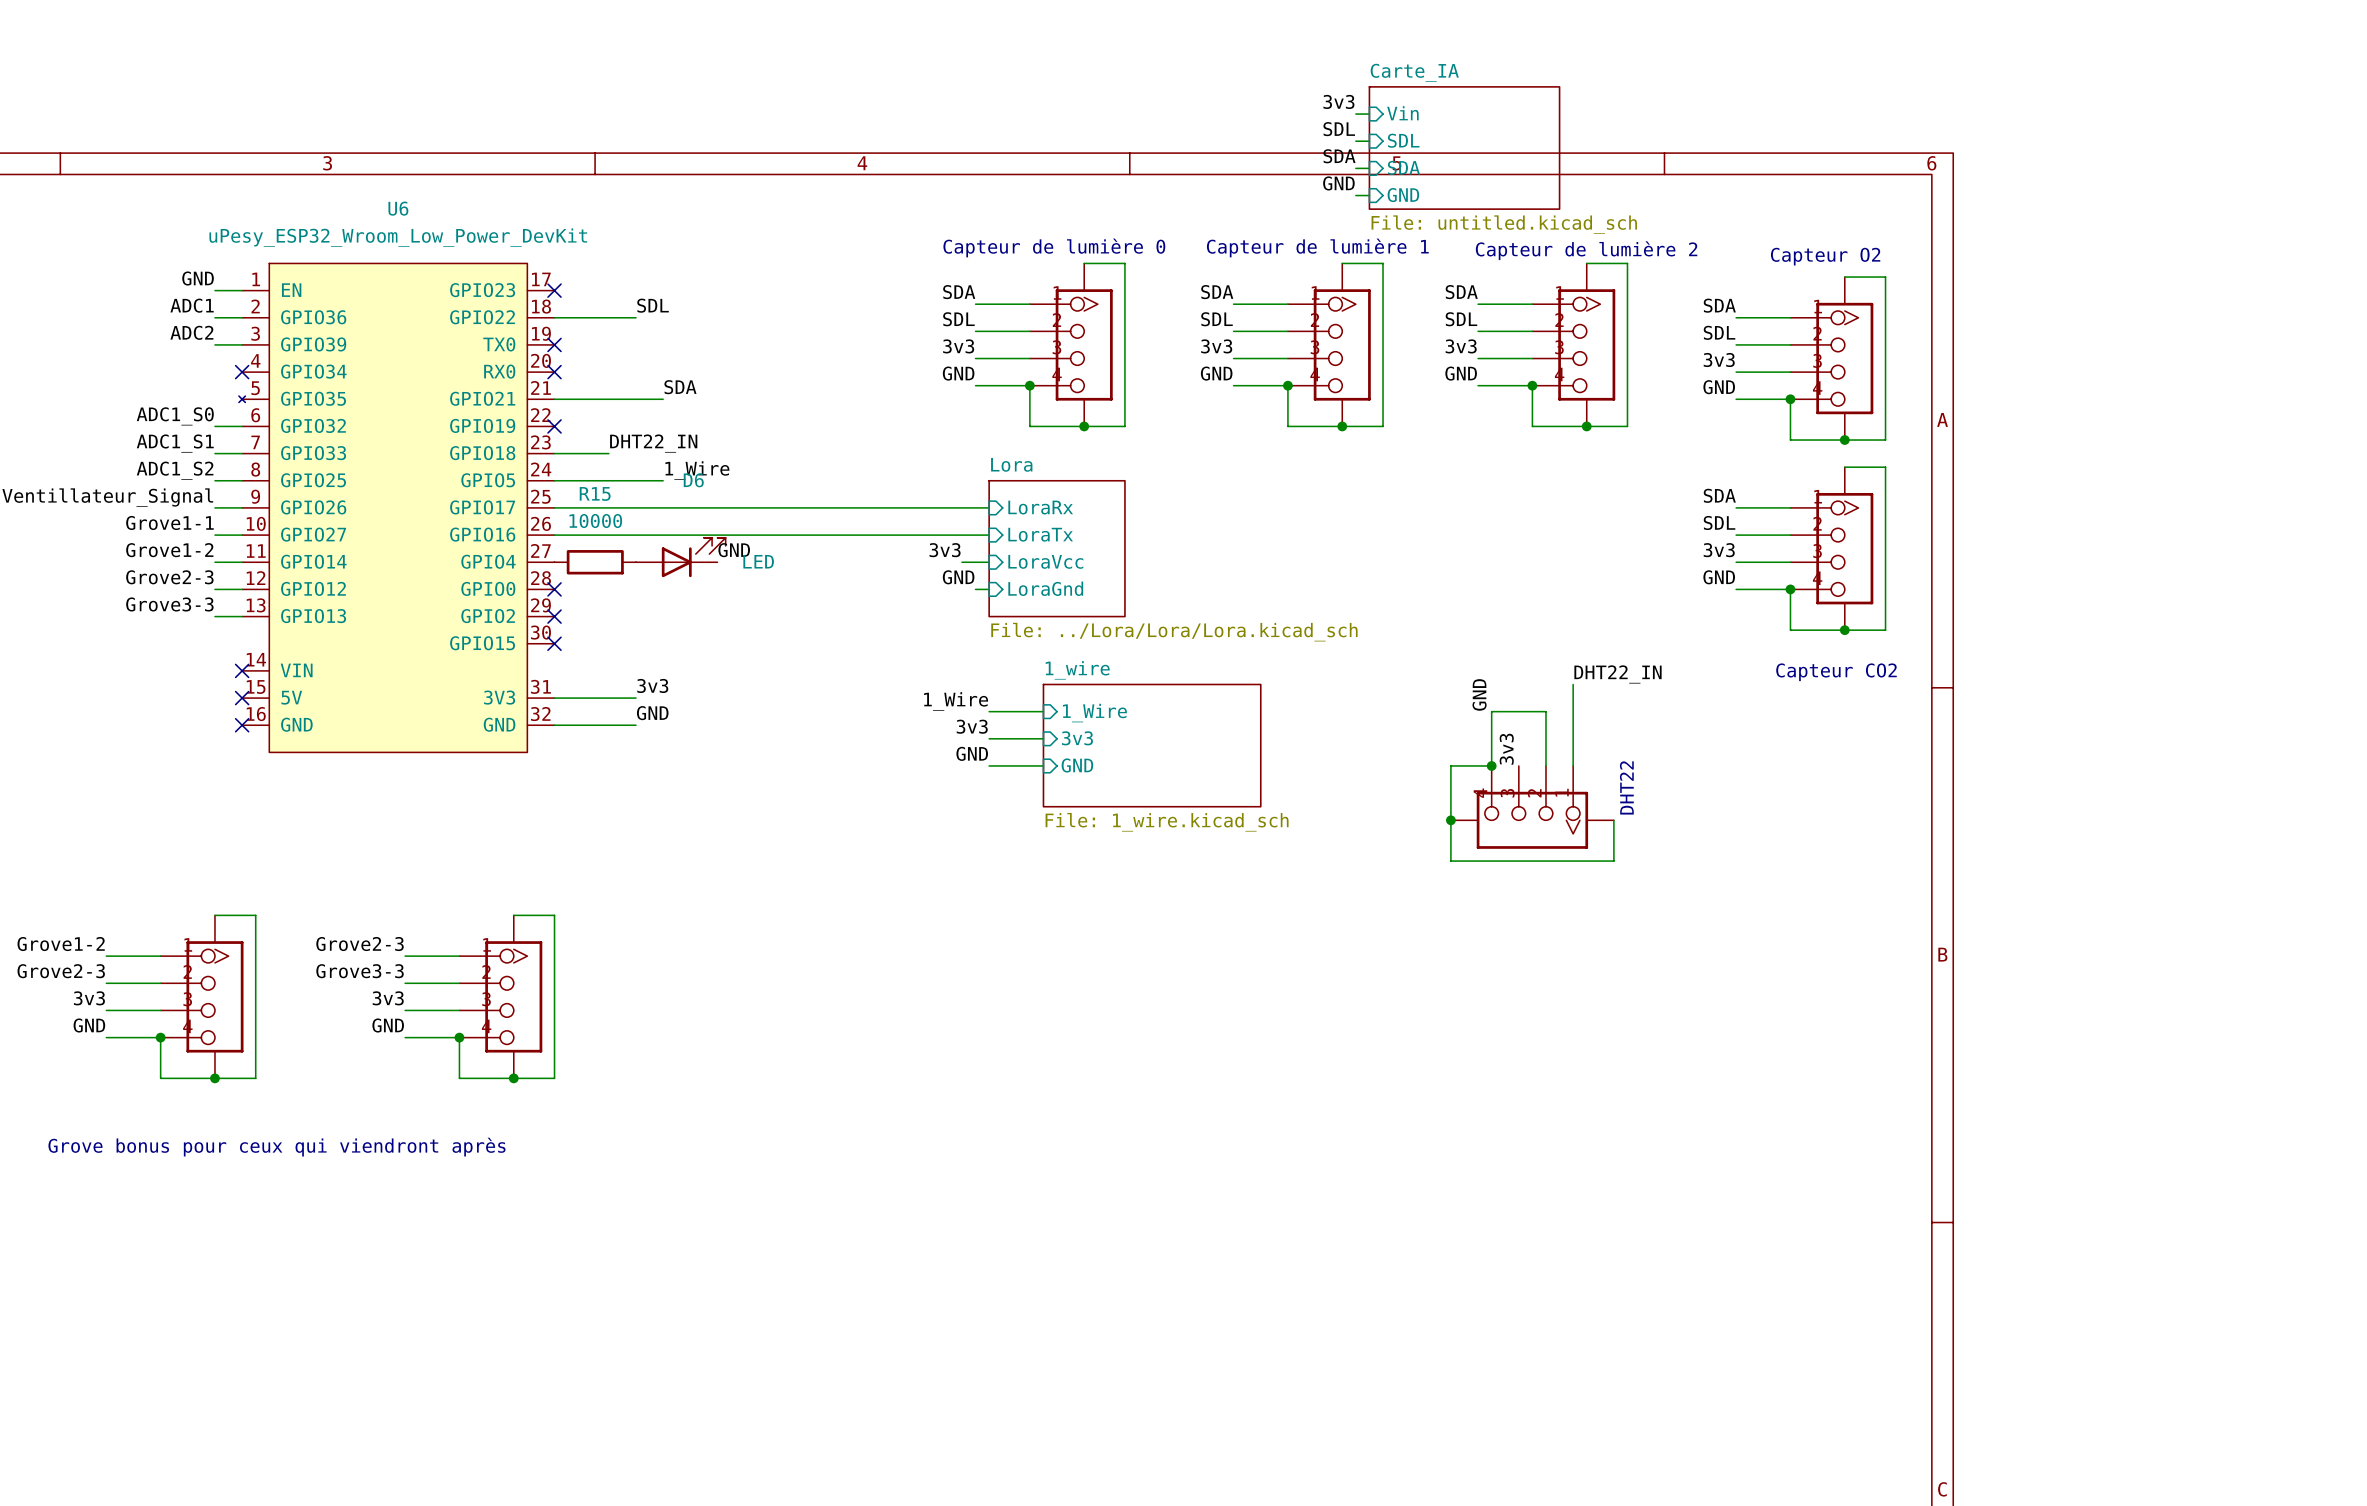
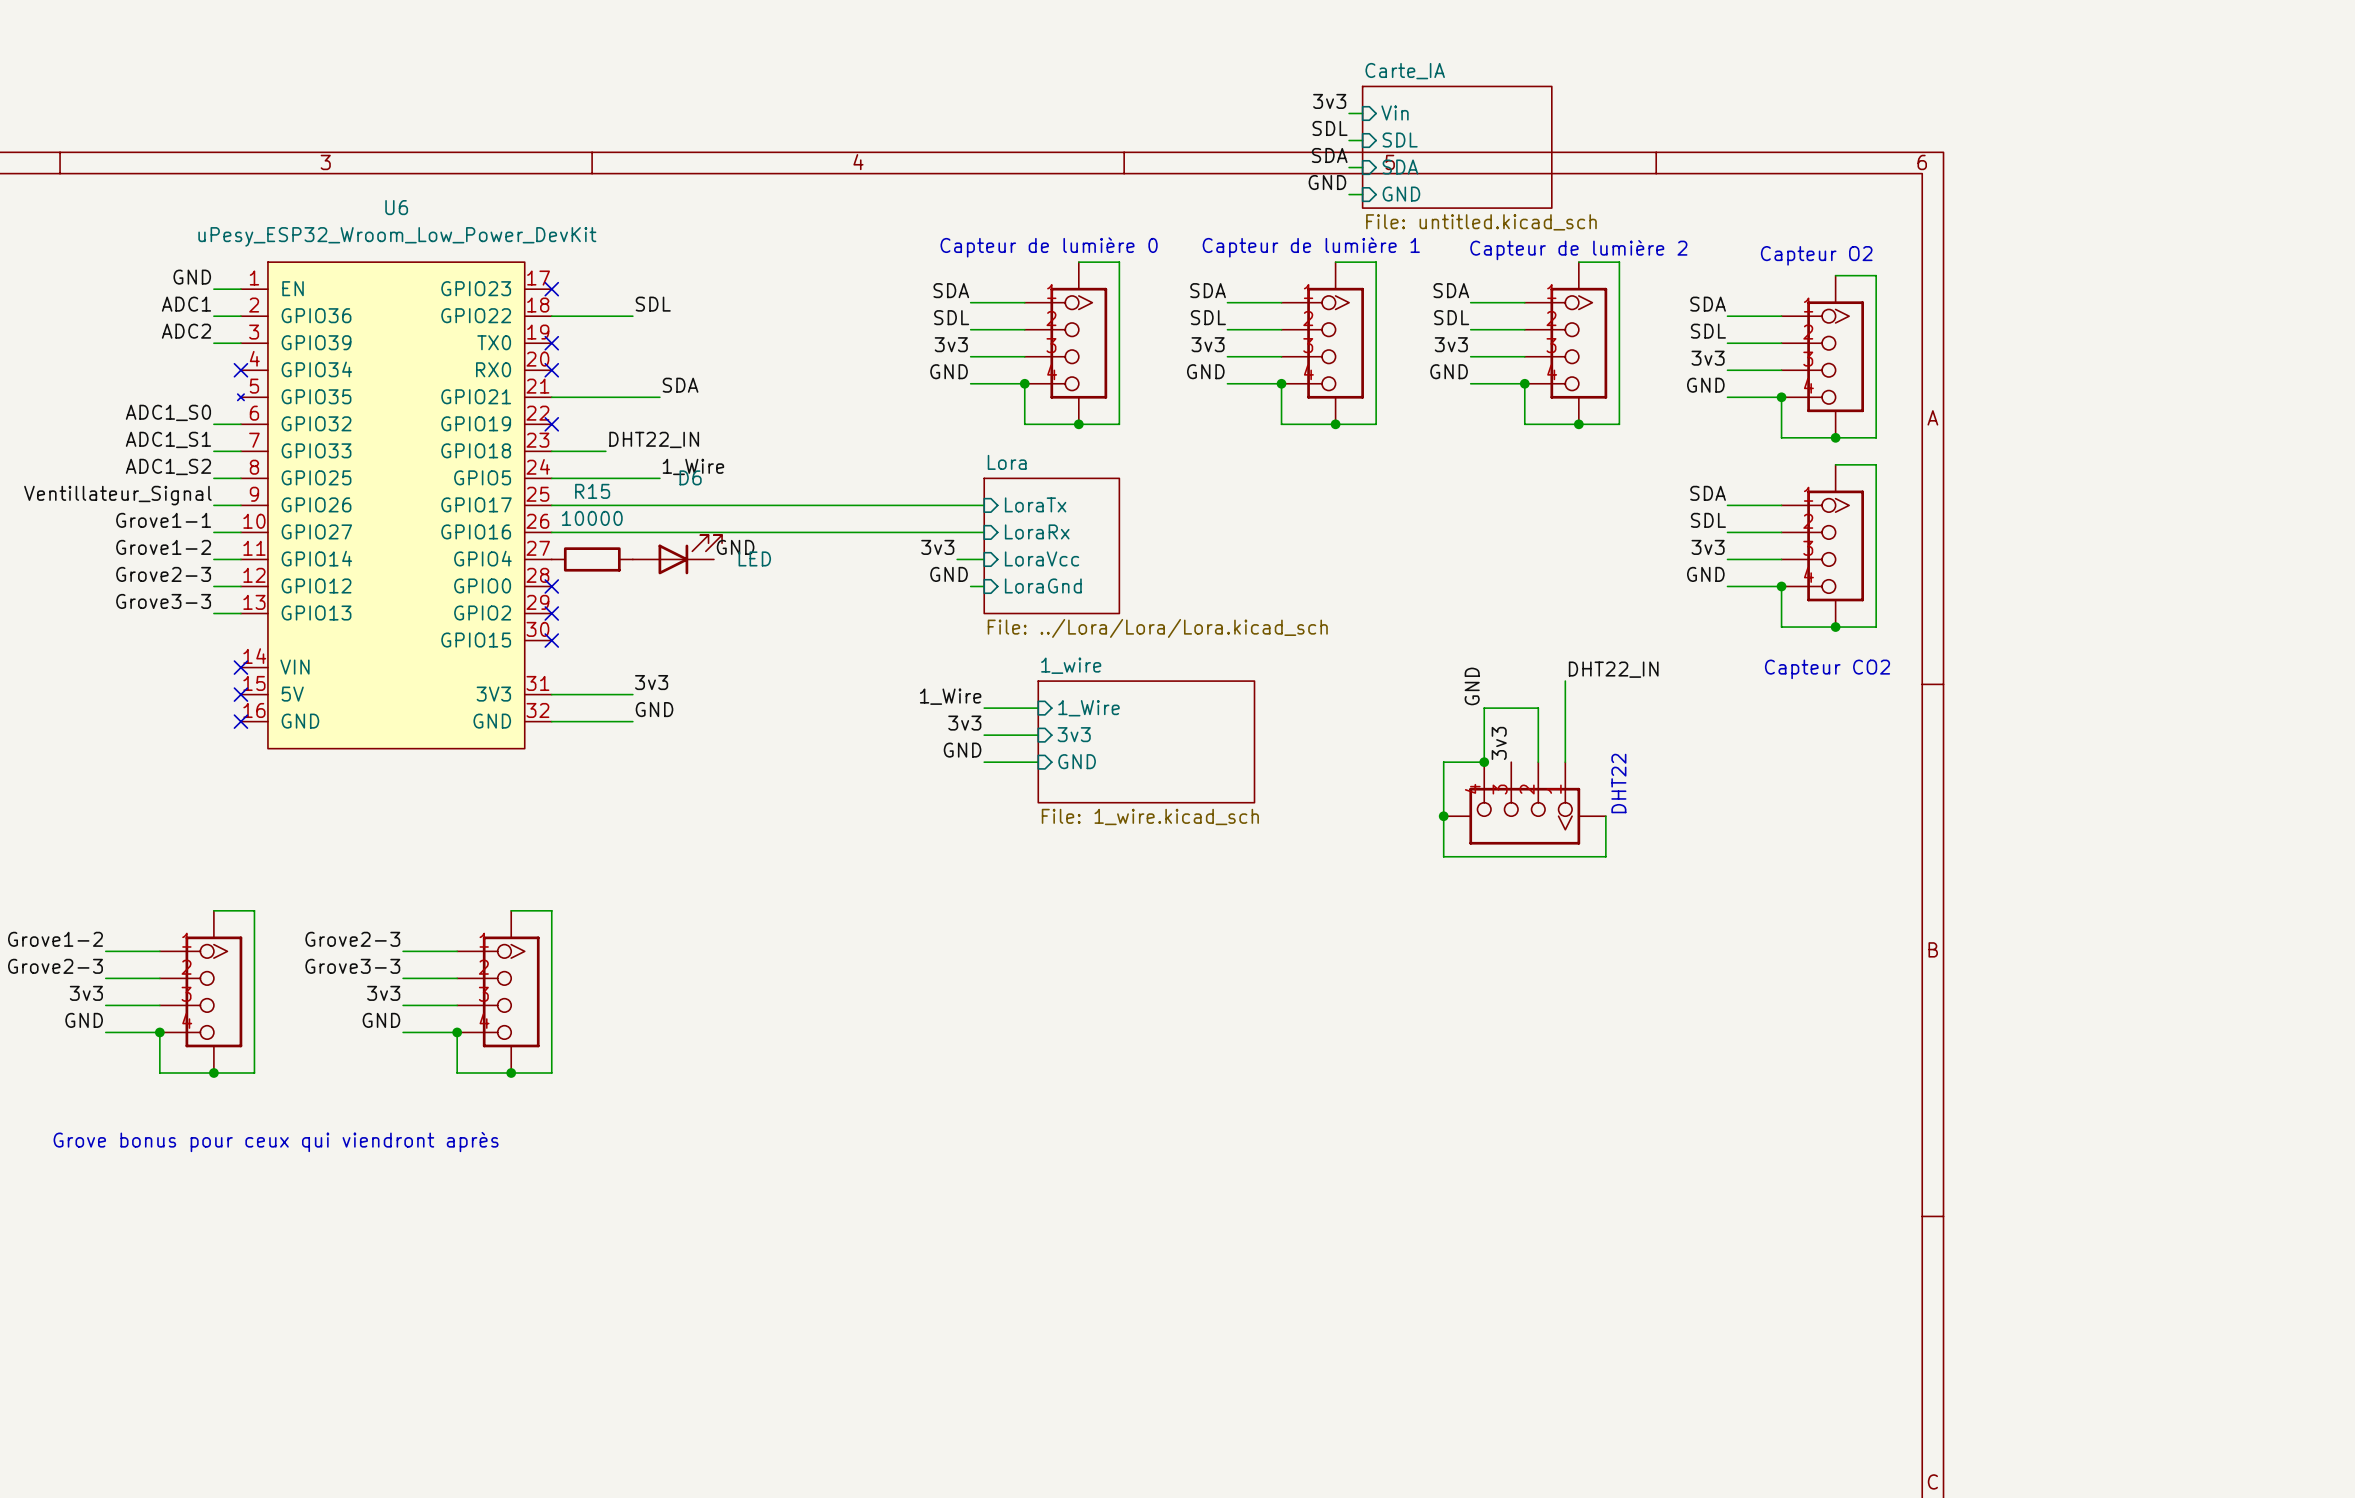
sheet pin: LoraRx (1040, 507) -> LoraTx (1035, 504)
sheet pin: LoraTx (1040, 534) -> LoraRx (1037, 531)

